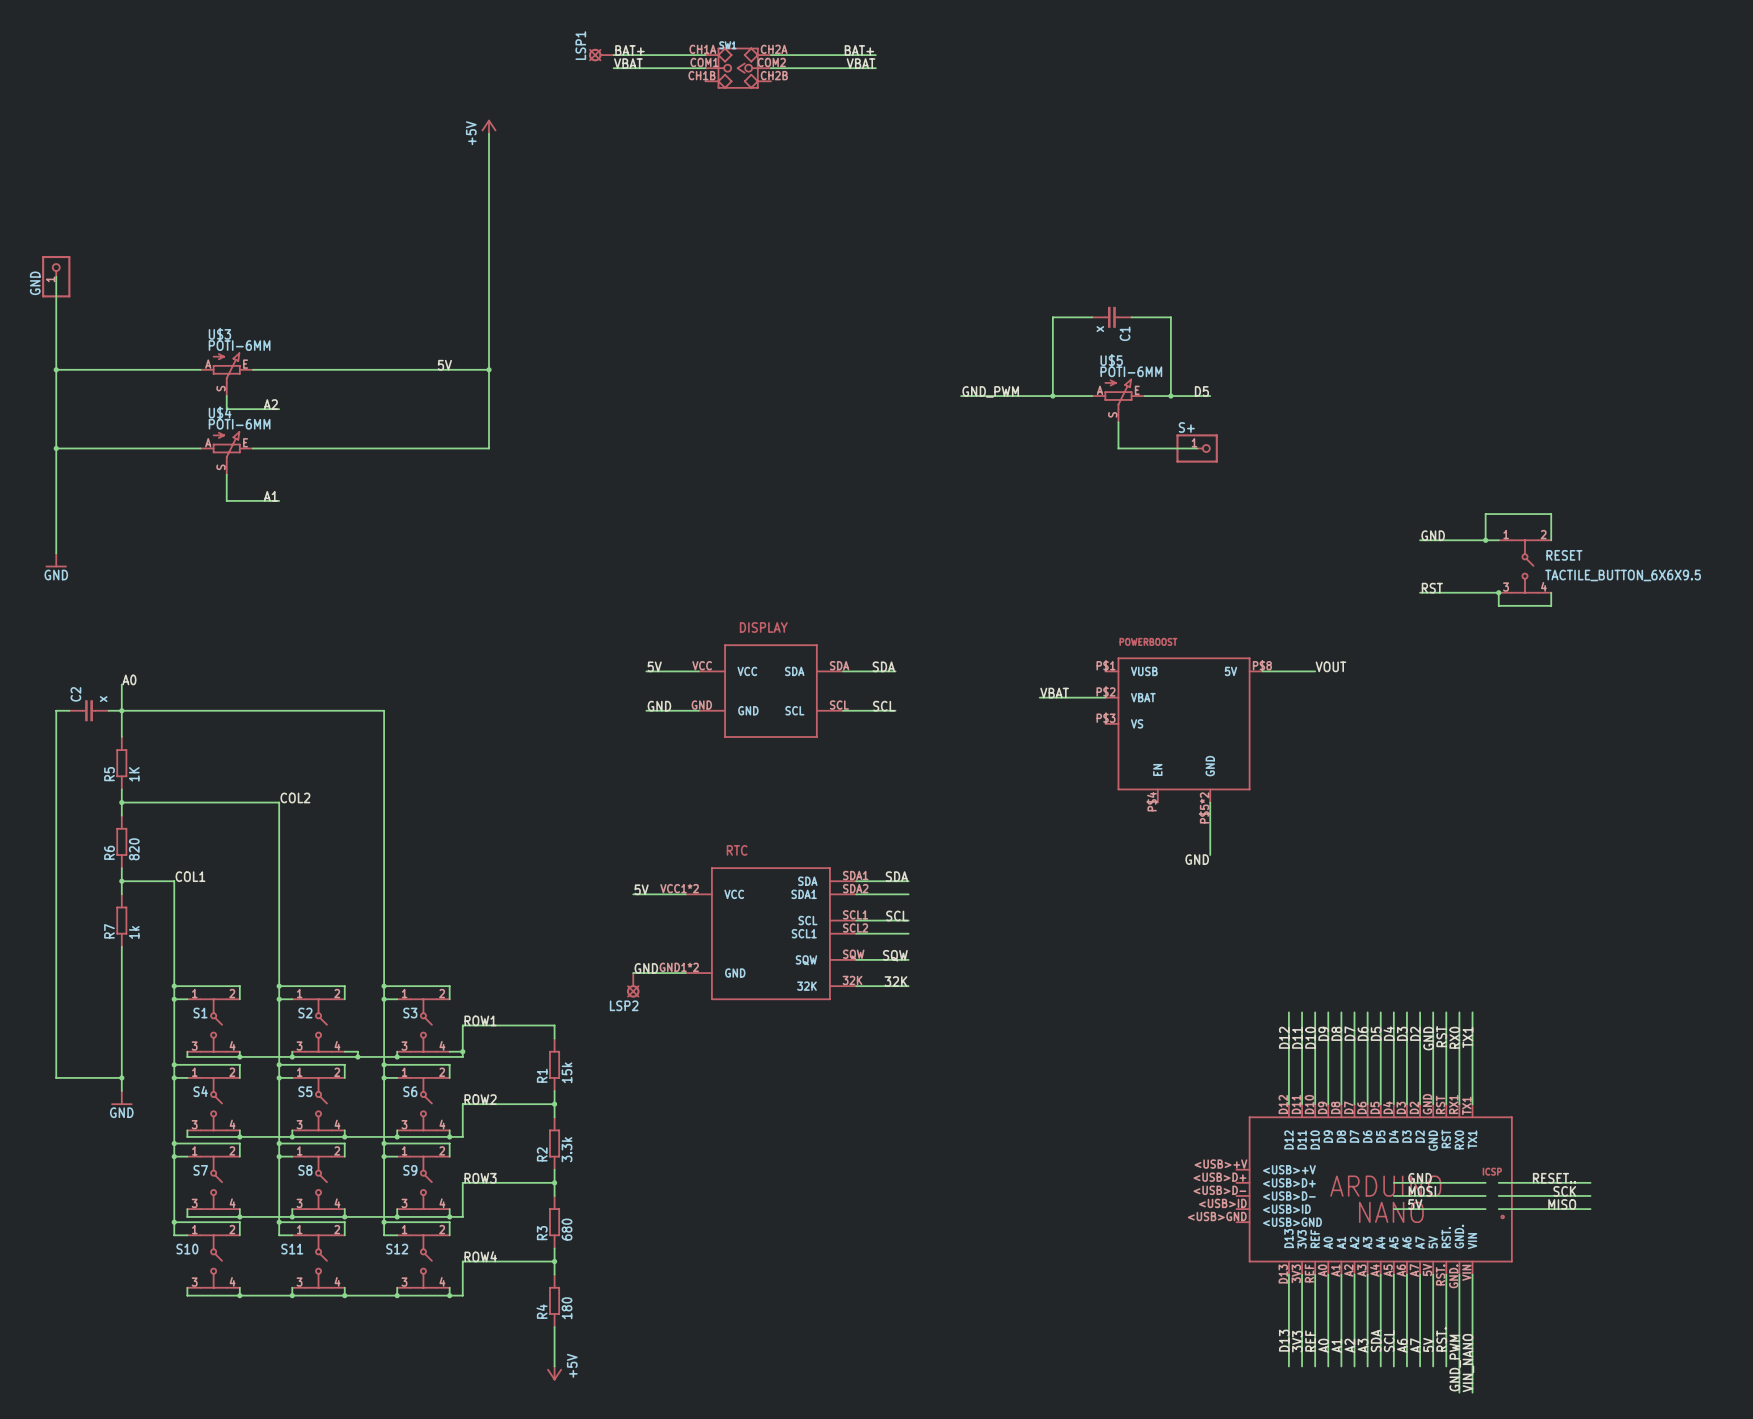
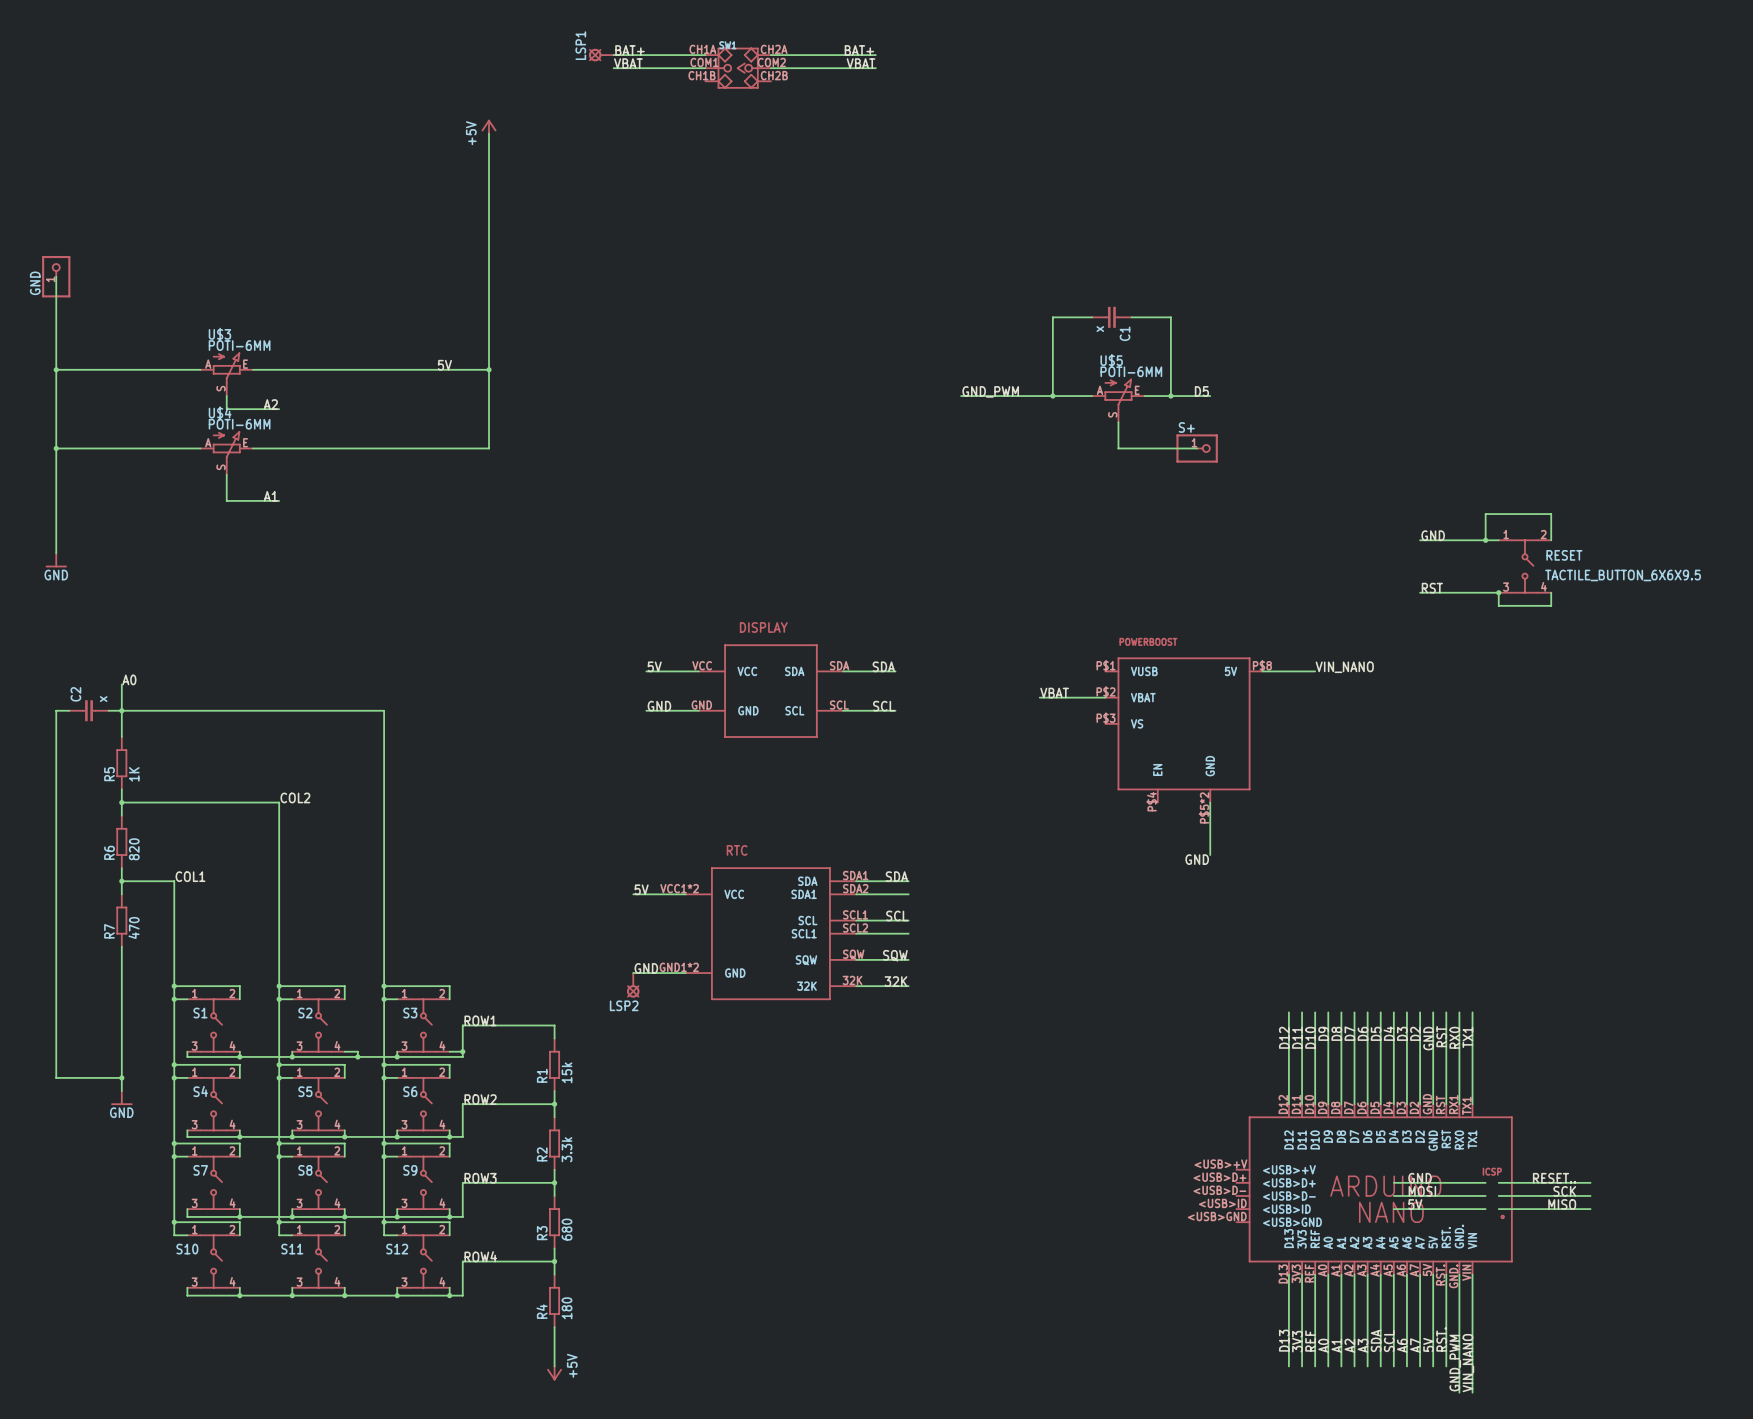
label: VOUT (1330, 666) -> VIN_NANO (1344, 667)
R7 value: 1k (134, 932) -> 470 (134, 927)

